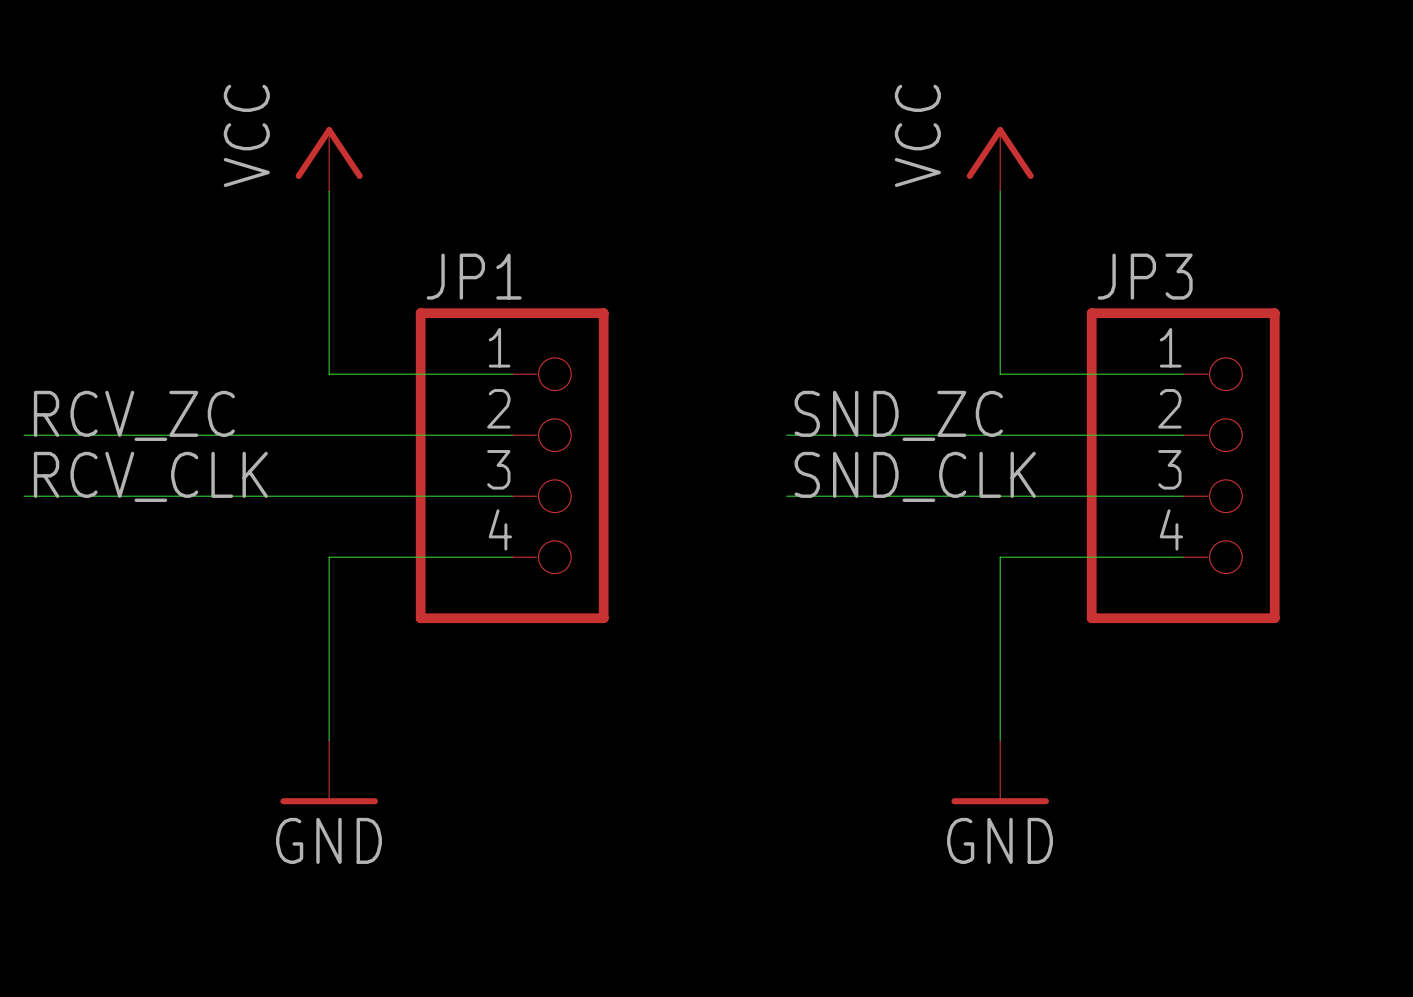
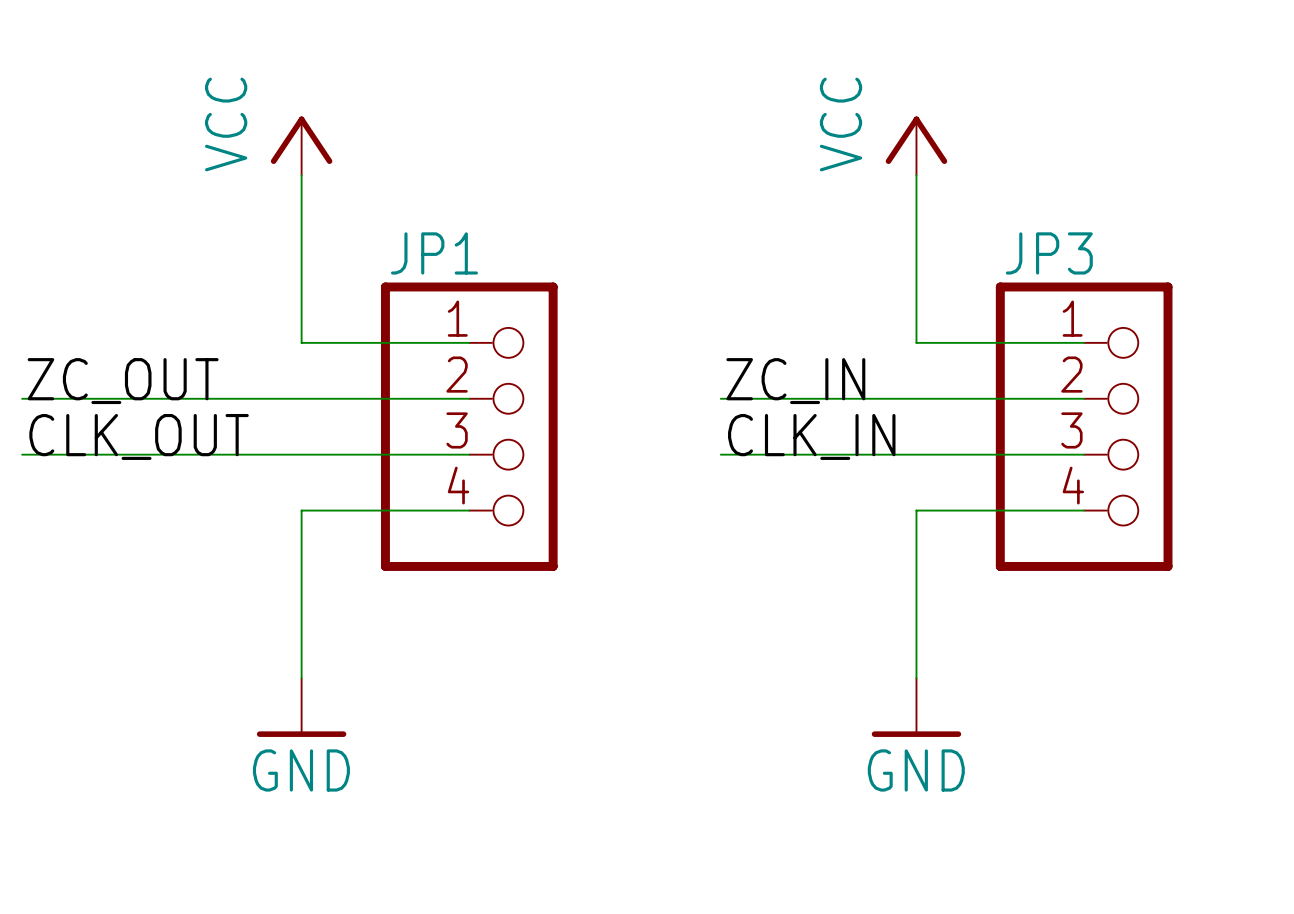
label: RCV_ZC (134, 415) -> ZC_OUT (123, 381)
label: SND_ZC (898, 415) -> ZC_IN (795, 381)
label: RCV_CLK (150, 476) -> CLK_OUT (139, 436)
label: SND_CLK (915, 476) -> CLK_IN (811, 436)

